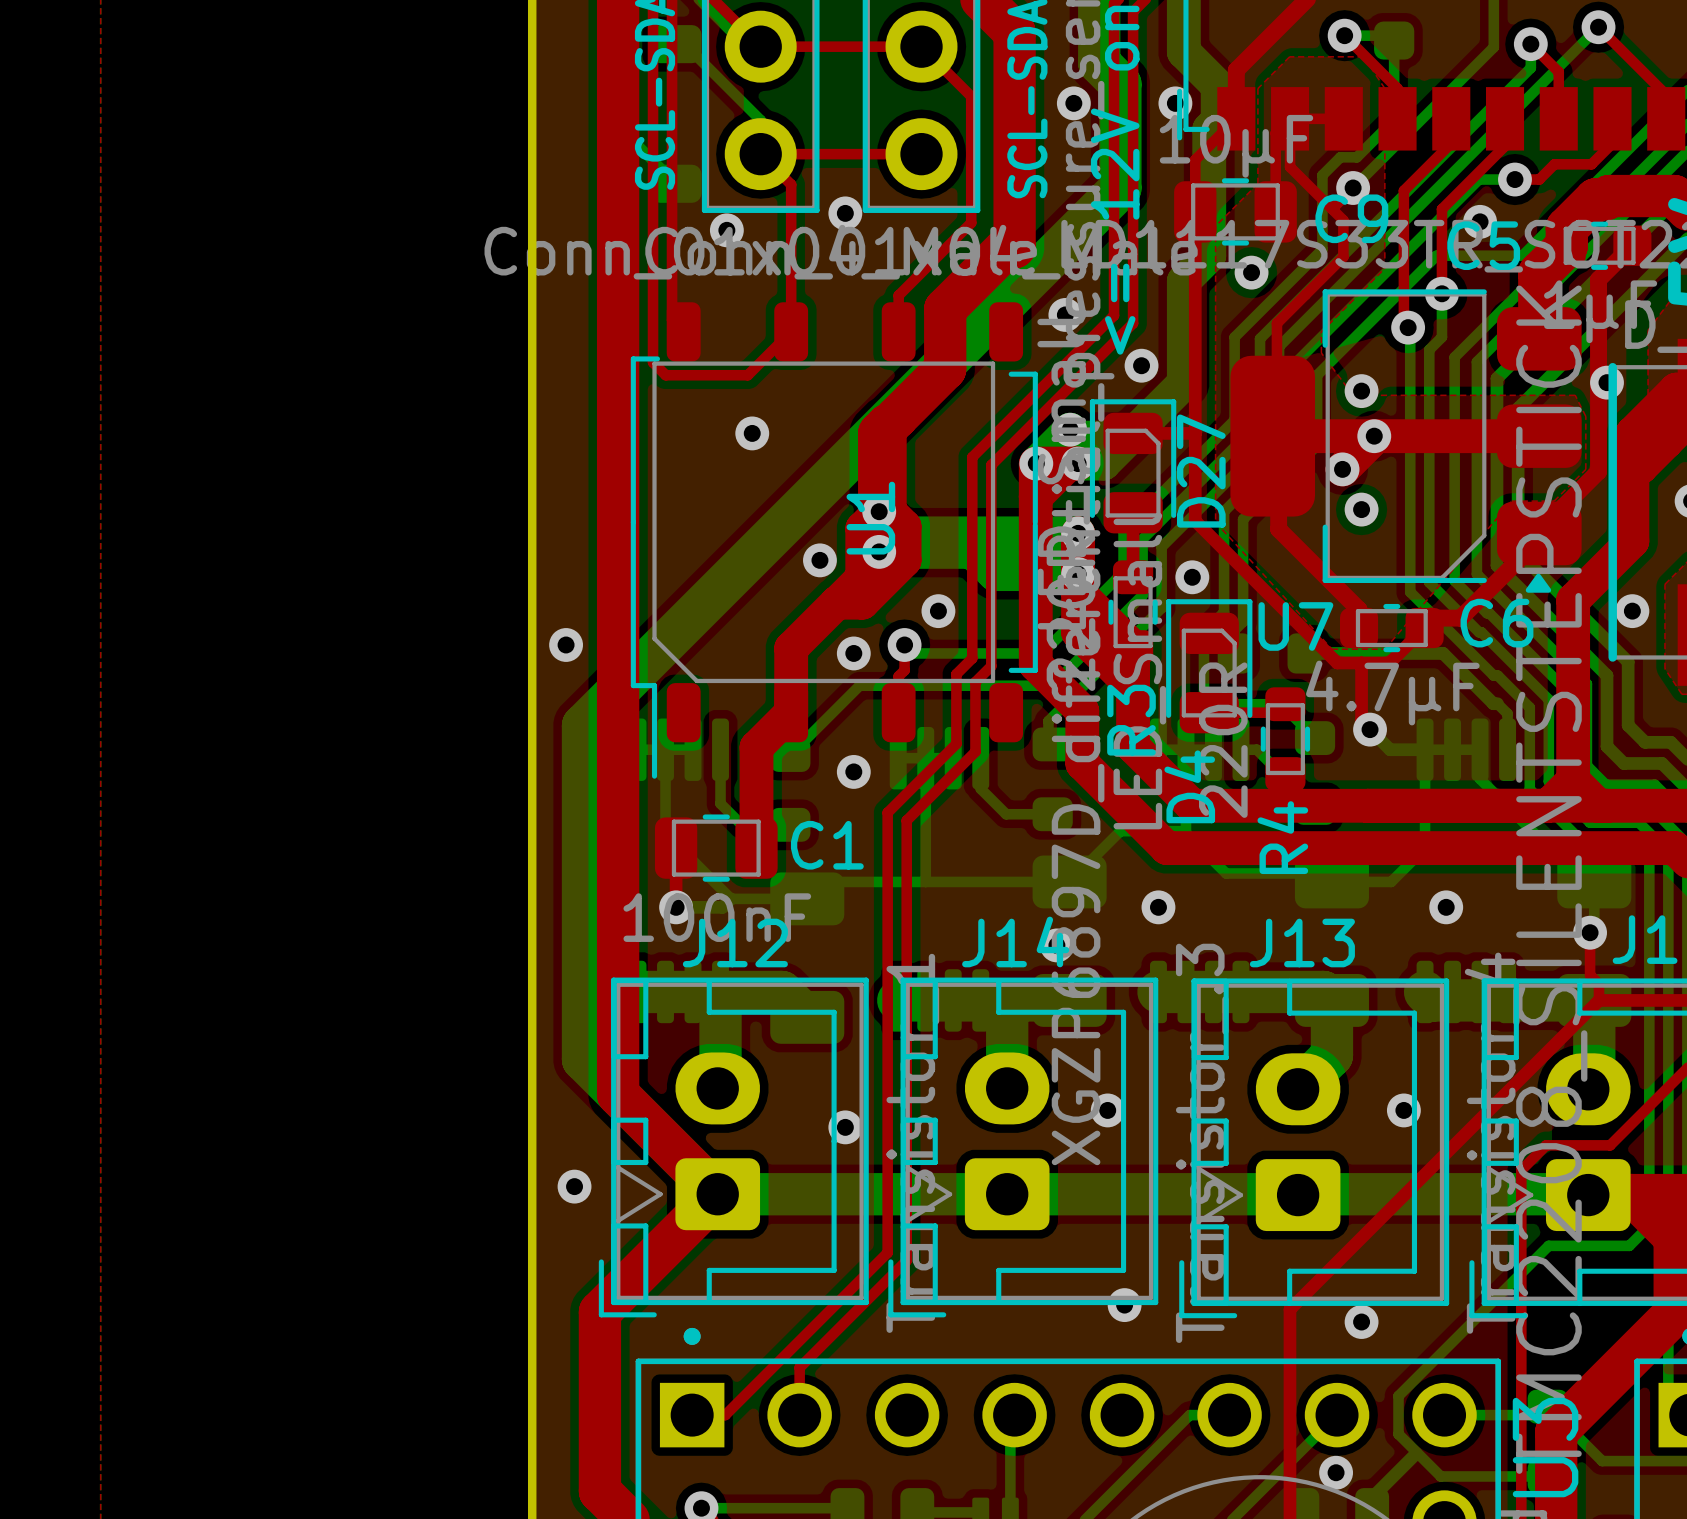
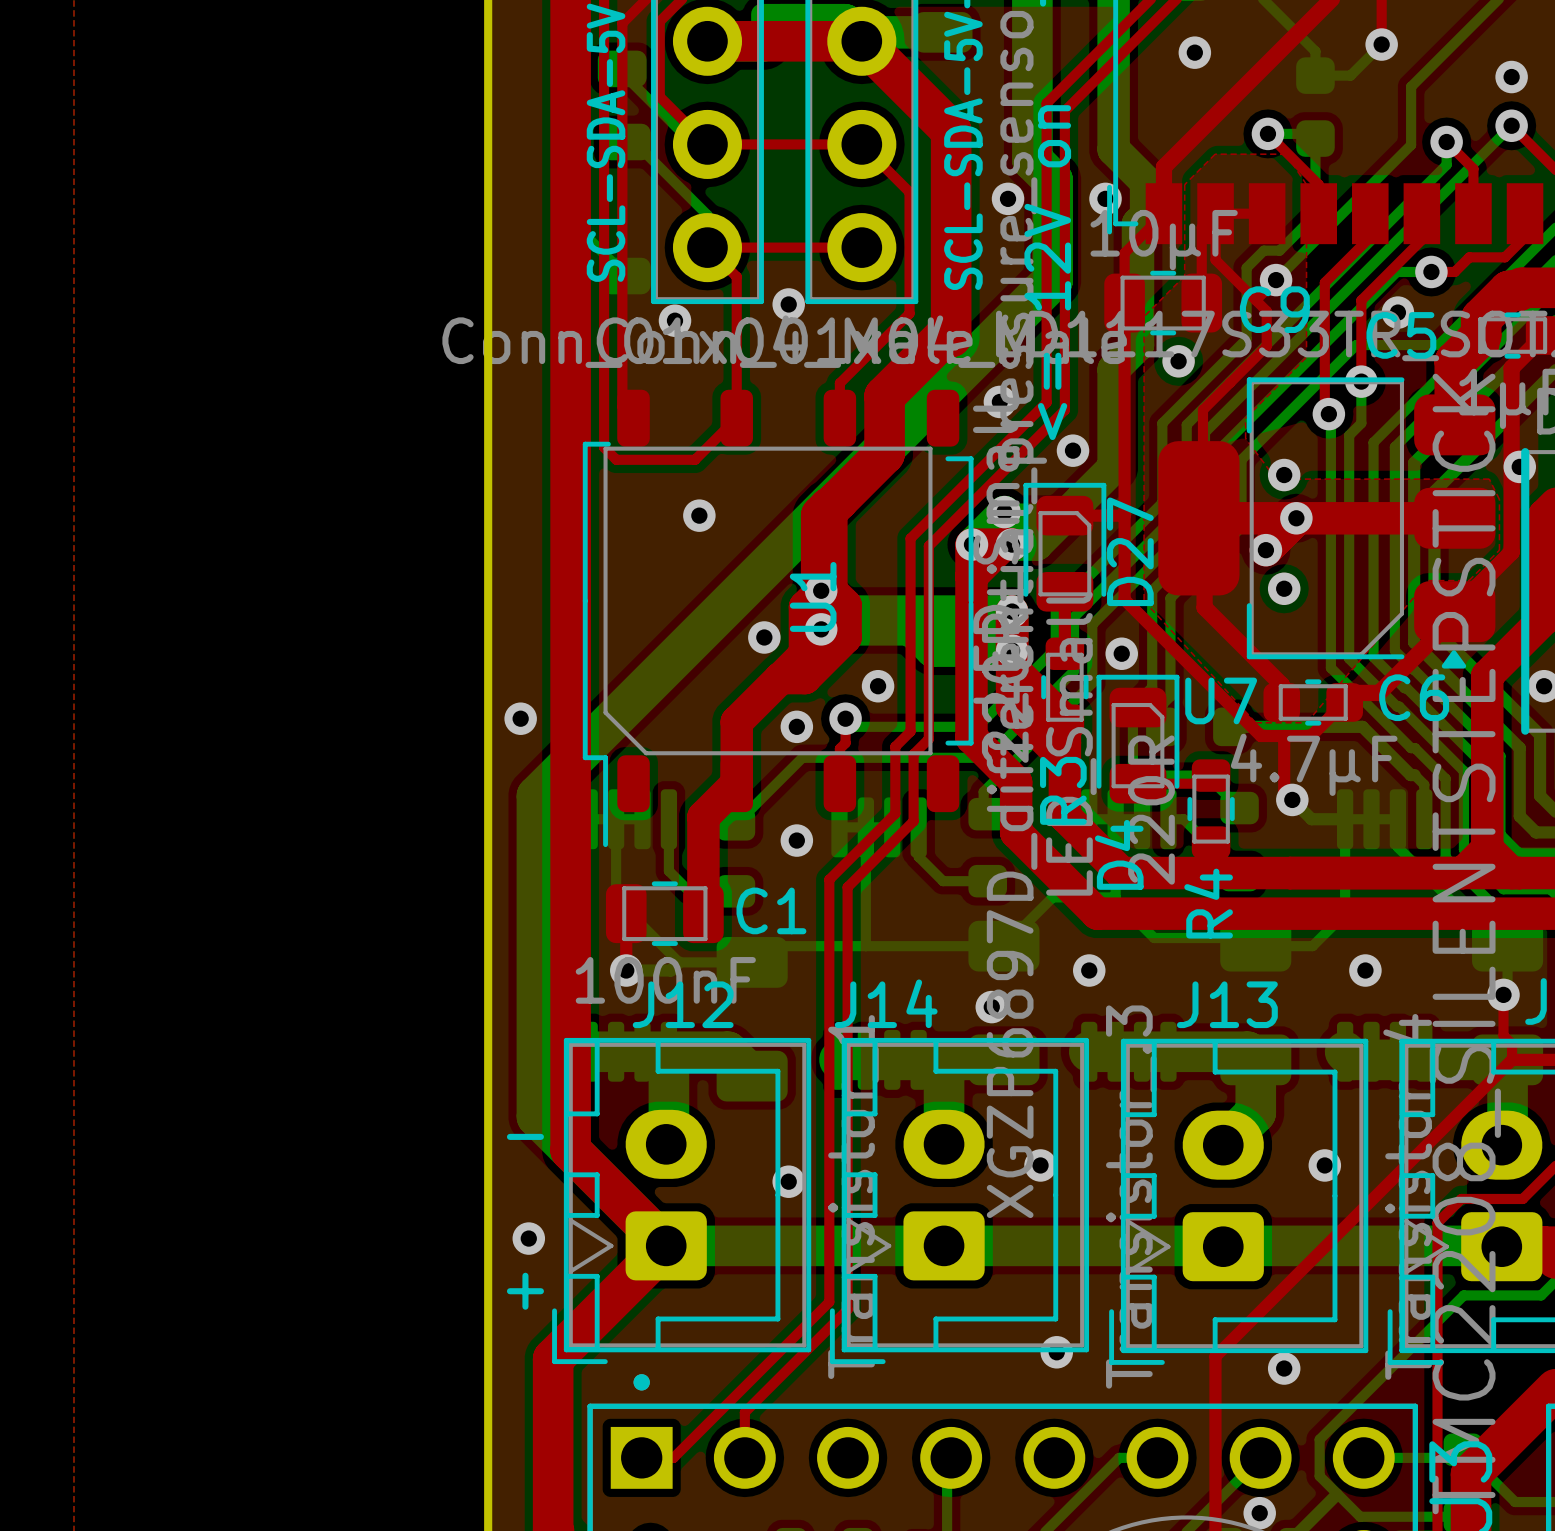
J14 name position: J14 (1015, 941) -> J14 (886, 1003)
text: none -> - (525, 1136)
text: none -> + (525, 1291)

